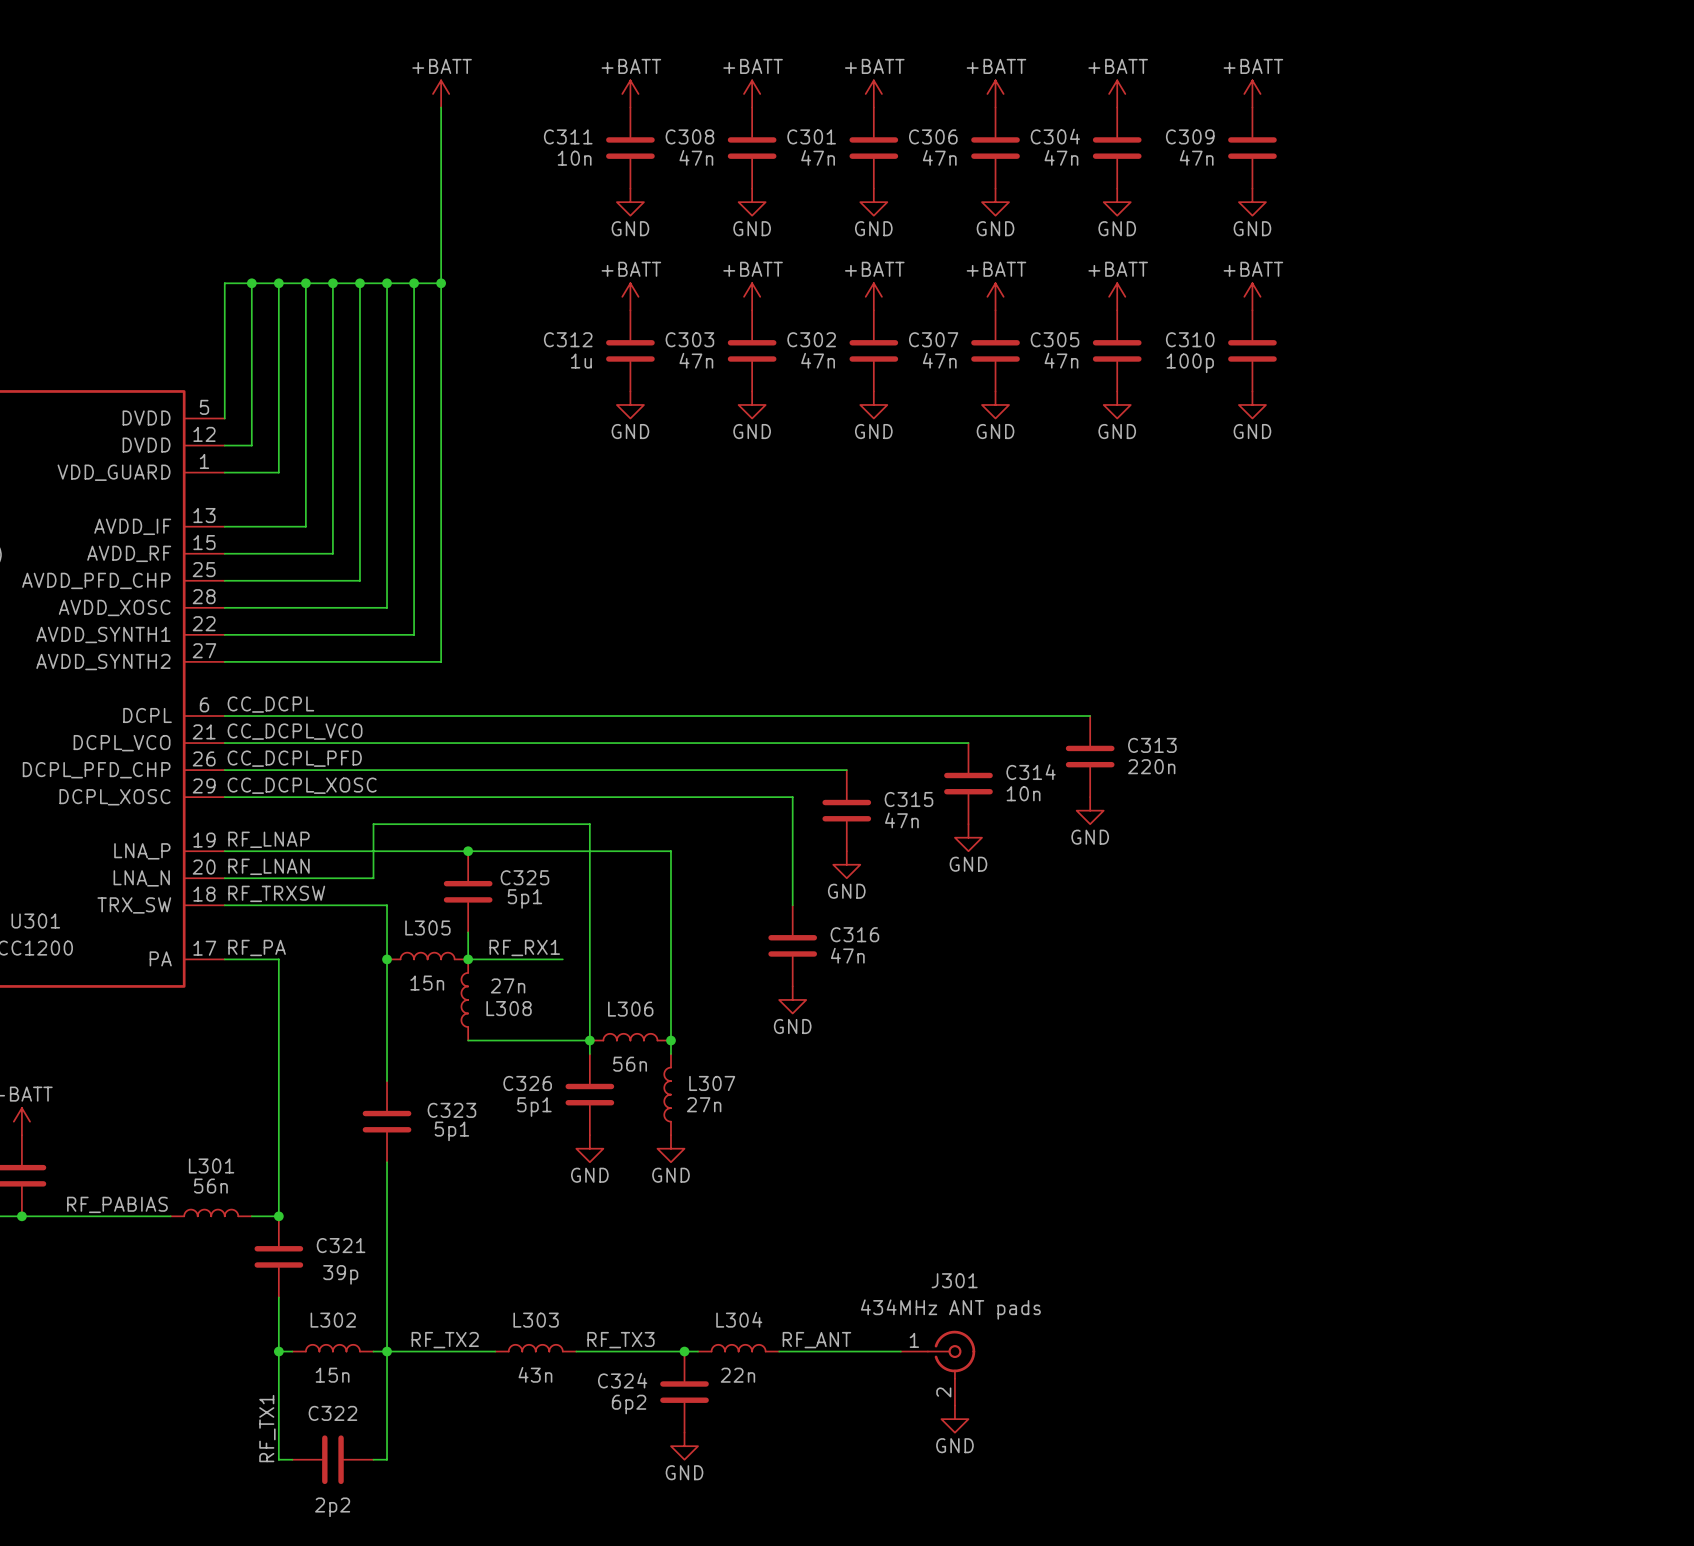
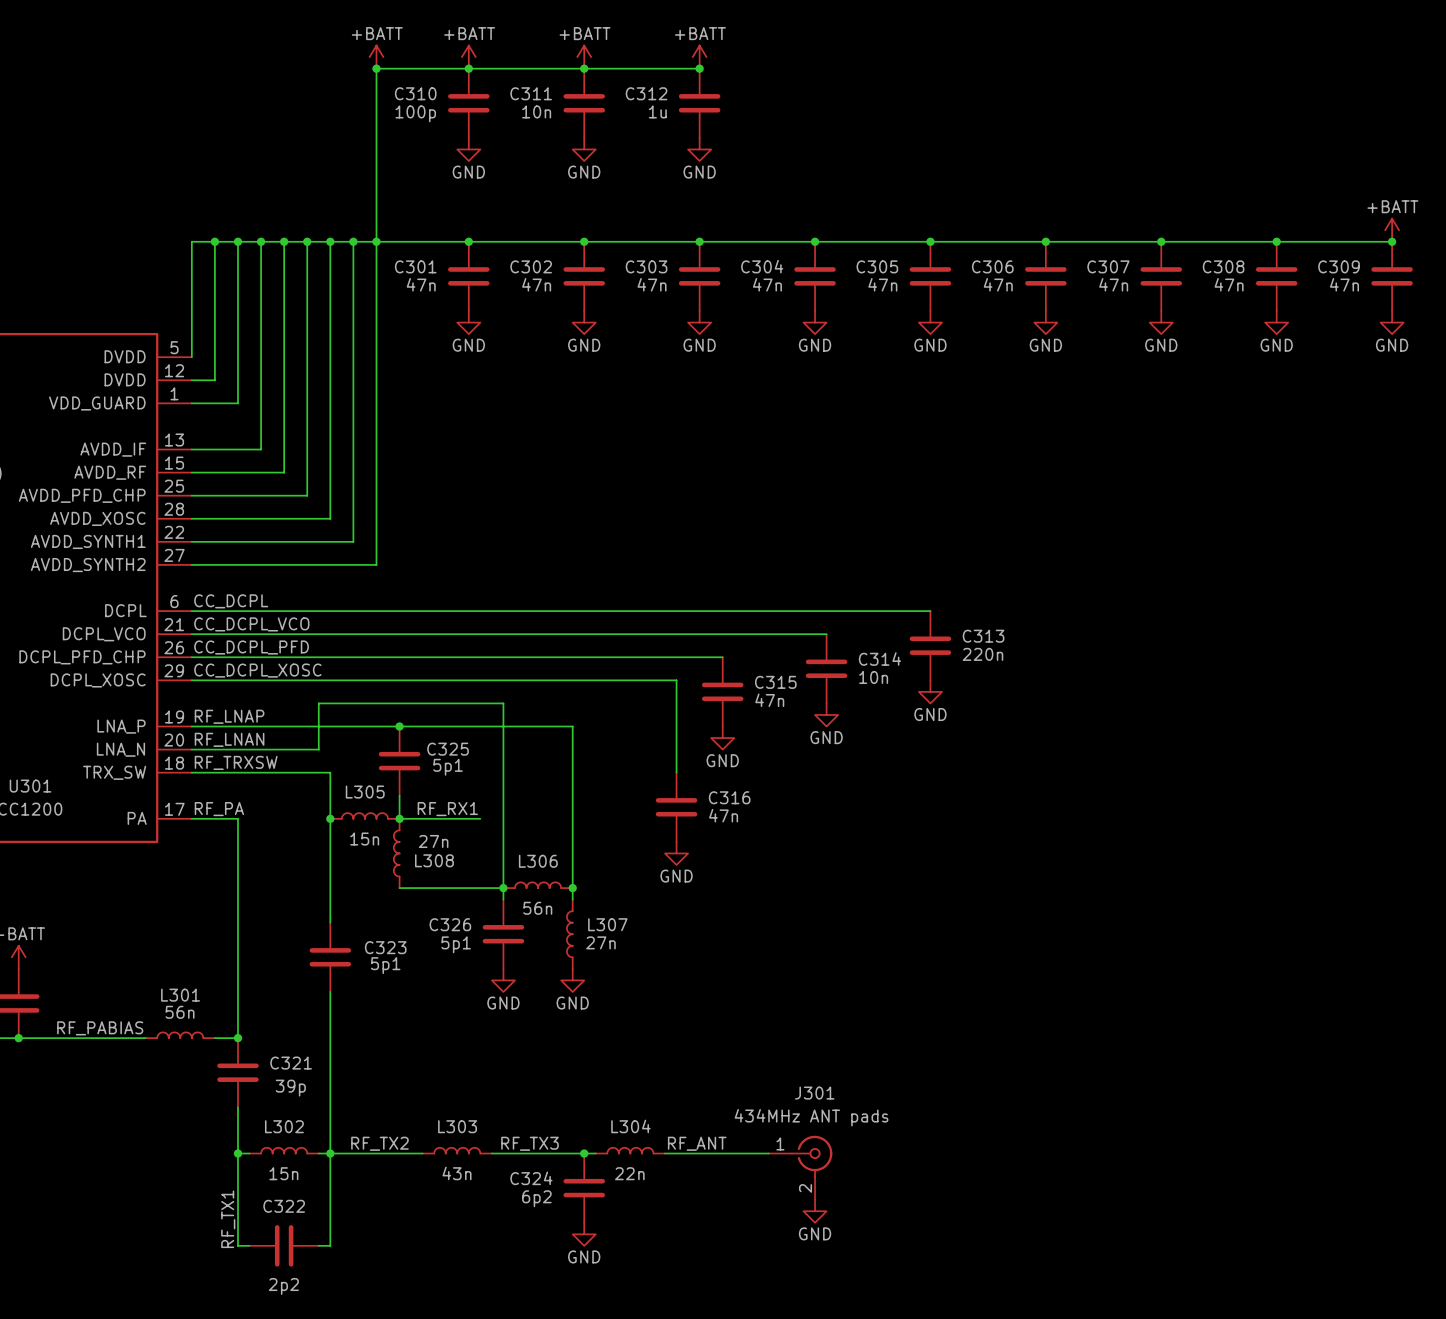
power symbol: none -> +BATT (468, 57)
power symbol: none -> +BATT (584, 57)
power symbol: none -> +BATT (699, 57)
junction: none -> (376, 68)
junction: none -> (468, 68)
junction: none -> (584, 68)
wire: none -> (699, 68) (376, 68) (376, 91)
junction: none -> (699, 68)
power symbol position: +BATT (441, 93) -> +BATT (376, 57)
power symbol: +BATT (630, 93) -> none
power symbol: +BATT (752, 93) -> none
power symbol: +BATT (873, 93) -> none
power symbol: +BATT (995, 93) -> none
power symbol: +BATT (1117, 93) -> none
power symbol: +BATT (1252, 93) -> none
C311 position: (630, 148) -> (584, 103)
C308 position: (752, 148) -> (1276, 276)
C301 position: (873, 148) -> (468, 276)
C306 position: (995, 148) -> (1045, 276)
C304 position: (1117, 148) -> (815, 276)
C309 position: (1252, 148) -> (1392, 276)
power symbol: none -> GND (468, 149)
power symbol: none -> GND (584, 149)
power symbol: none -> GND (699, 149)
power symbol: GND (630, 202) -> none
power symbol: GND (752, 202) -> none
power symbol: GND (873, 202) -> none
power symbol: GND (995, 202) -> none
power symbol: GND (1117, 202) -> none
power symbol: GND (1252, 202) -> none
power symbol: none -> +BATT (1392, 230)
wire: none -> (376, 241) (1392, 241)
junction: none -> (468, 241)
junction: none -> (584, 241)
junction: none -> (699, 241)
junction: none -> (815, 241)
junction: none -> (930, 241)
junction: none -> (1045, 241)
junction: none -> (1161, 241)
junction: none -> (1276, 241)
junction: none -> (1392, 241)
power symbol: +BATT (630, 296) -> none
power symbol: +BATT (752, 296) -> none
power symbol: +BATT (873, 296) -> none
power symbol: +BATT (995, 296) -> none
power symbol: +BATT (1117, 296) -> none
power symbol: +BATT (1252, 296) -> none
C312 position: (630, 350) -> (699, 103)
C303 position: (752, 350) -> (699, 276)
C302 position: (873, 350) -> (584, 276)
C307 position: (995, 350) -> (1161, 276)
C305 position: (1117, 350) -> (930, 276)
C310 position: (1252, 350) -> (468, 103)
power symbol: none -> GND (468, 322)
power symbol: none -> GND (584, 322)
power symbol: none -> GND (699, 322)
power symbol: none -> GND (815, 322)
power symbol: none -> GND (1161, 322)
power symbol: none -> GND (1276, 322)
power symbol: none -> GND (1392, 322)
power symbol: GND (630, 404) -> none
power symbol: GND (752, 404) -> none
power symbol: GND (873, 404) -> none
power symbol: GND (995, 404) -> none
power symbol position: GND (1117, 404) -> GND (930, 322)
power symbol position: GND (1252, 404) -> GND (1045, 322)

